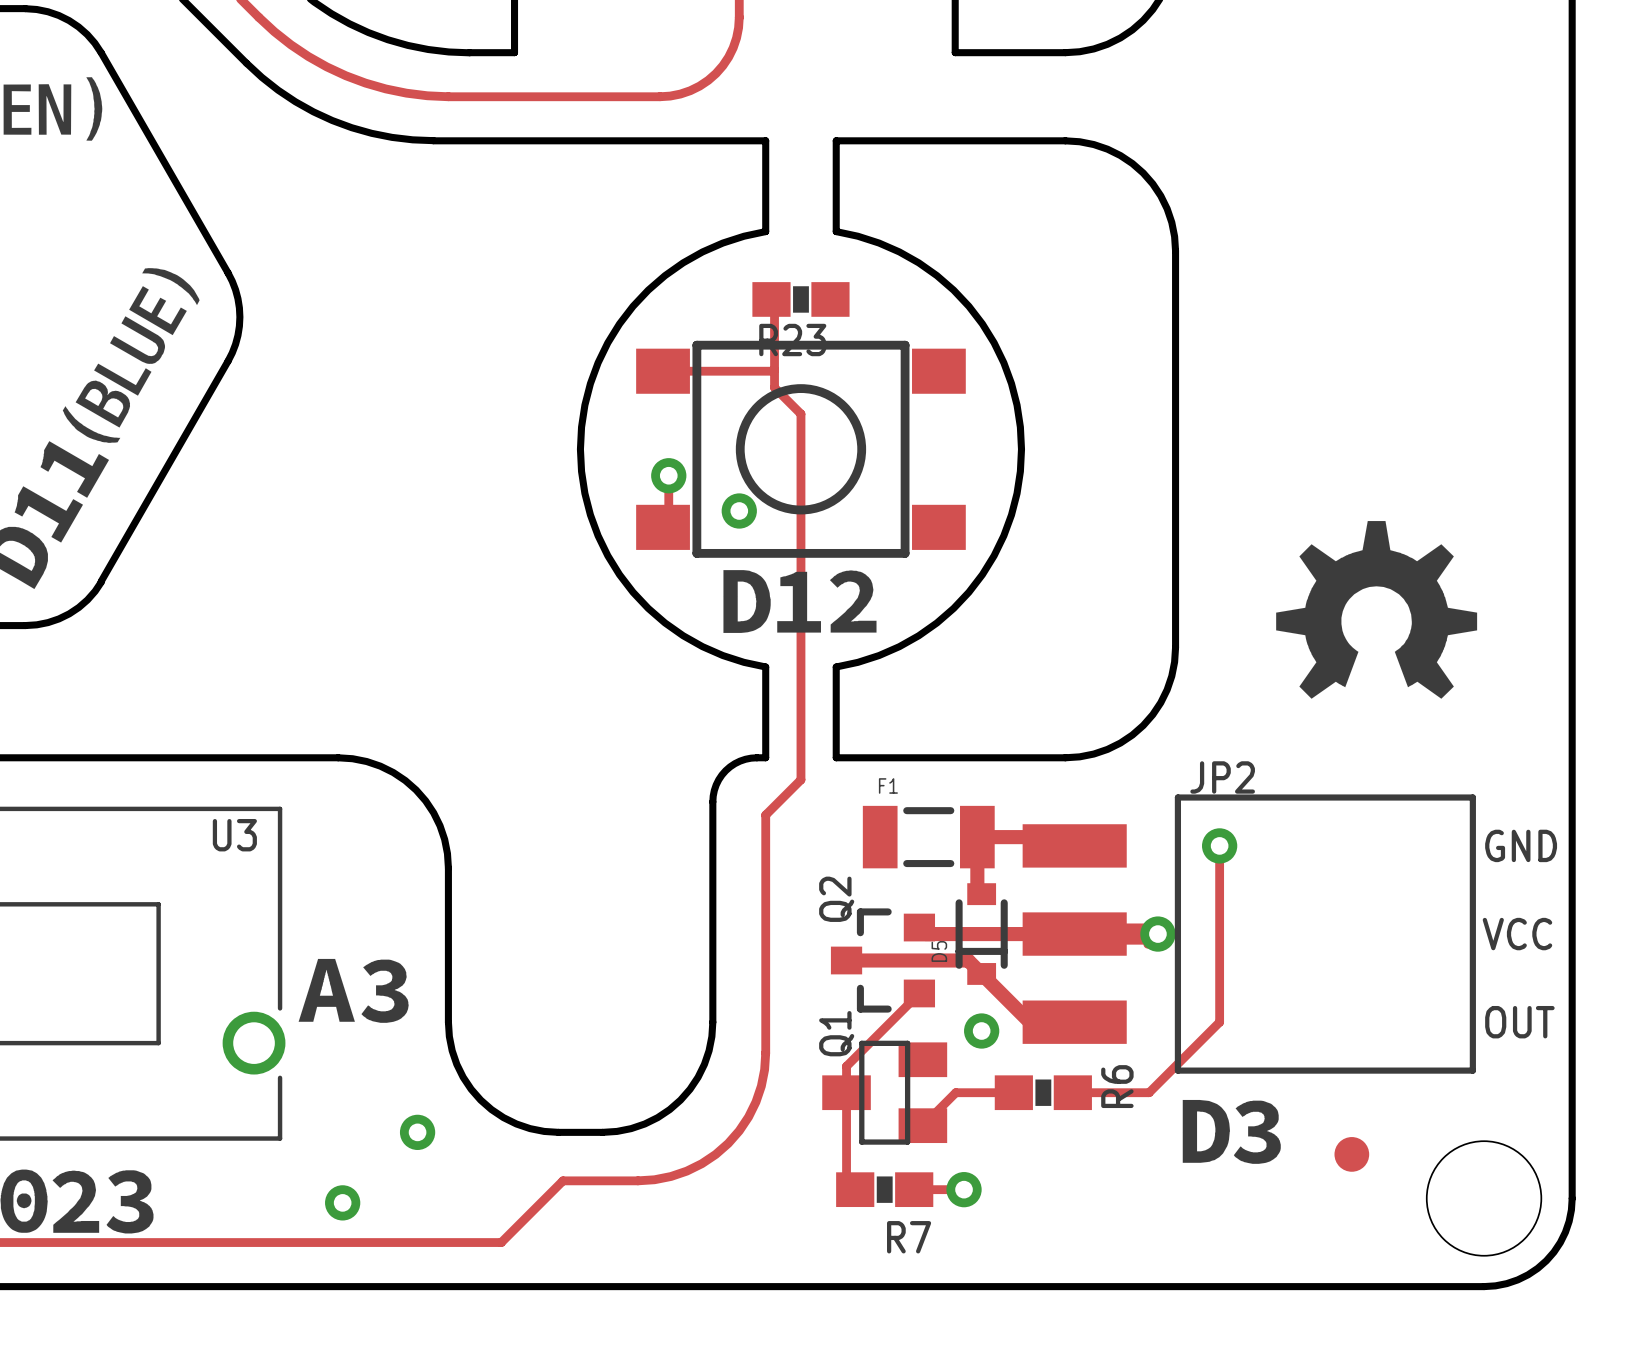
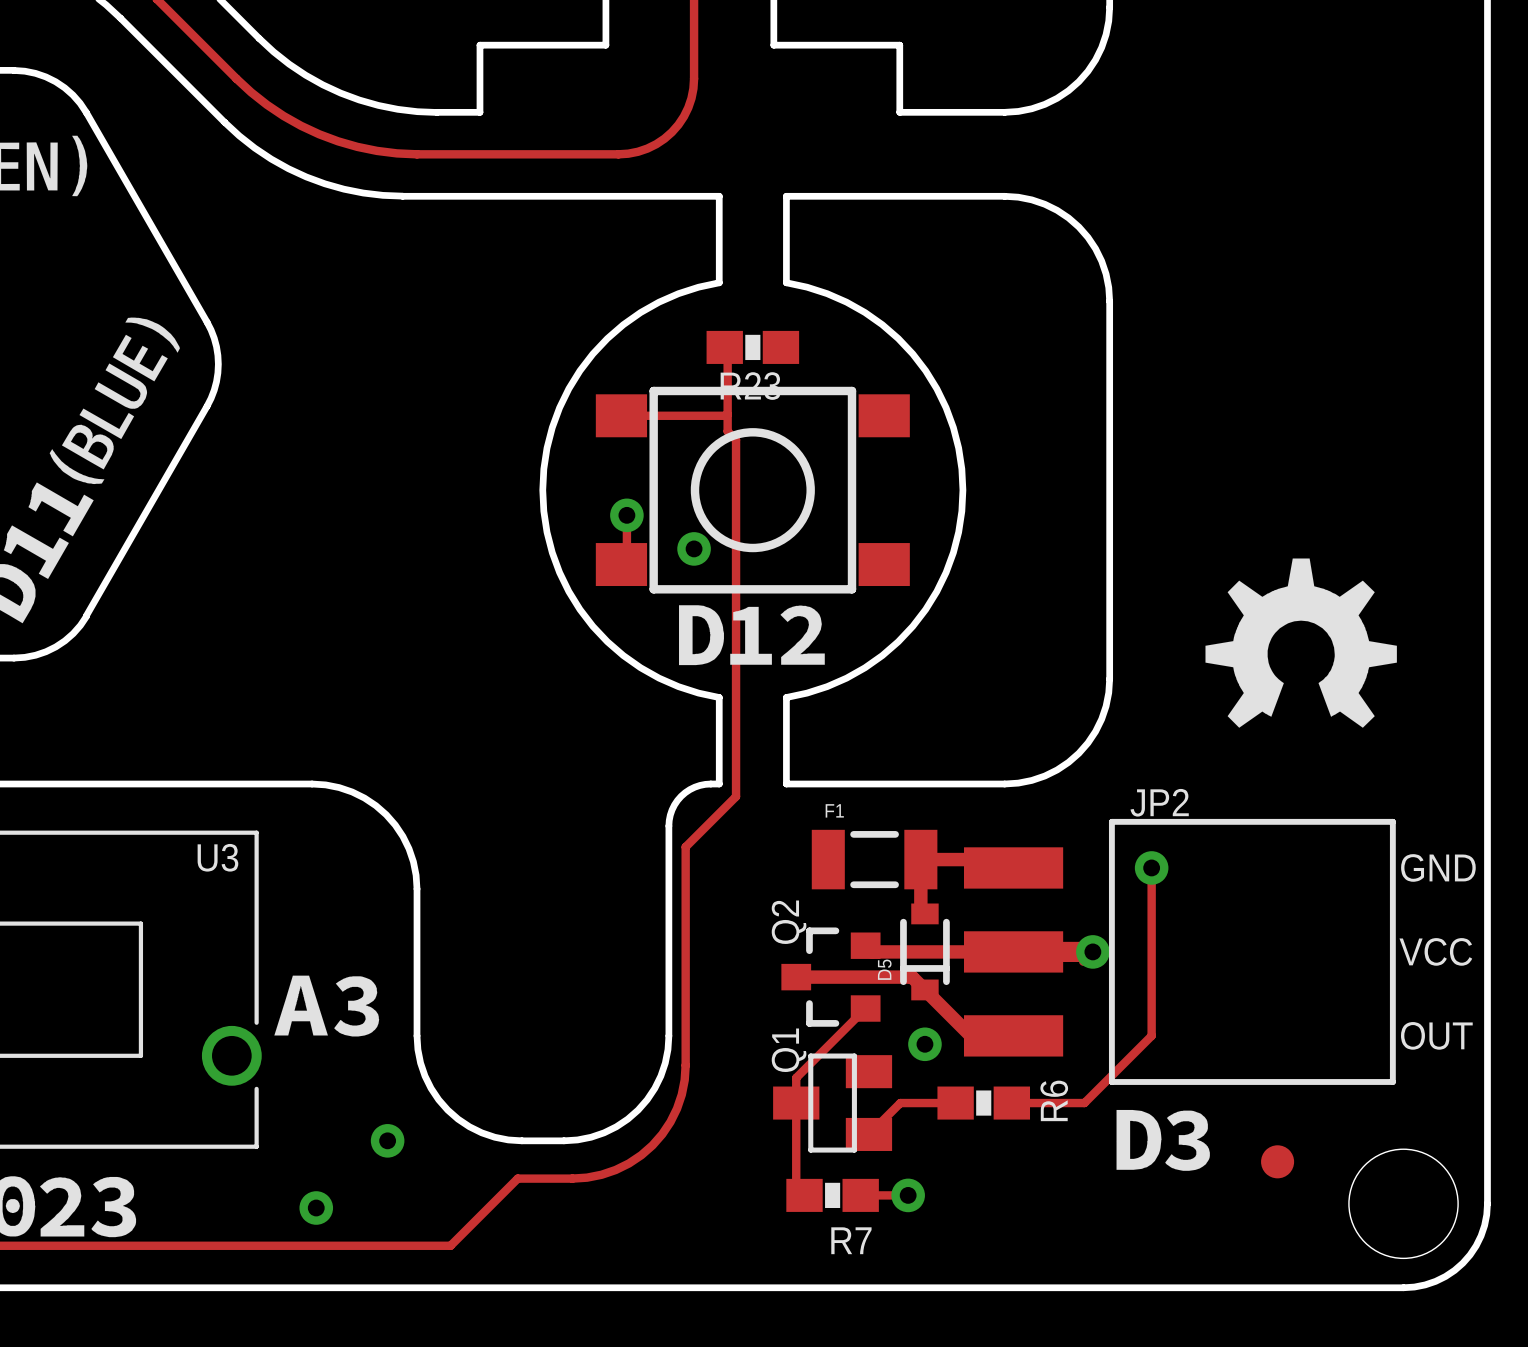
track: (783, 396) (800, 414) (800, 779) (765, 815) (765, 1053) (764, 1069) (755, 1101) (748, 1116) (728, 1143) (701, 1163) (686, 1171) (654, 1179) (563, 1180) (501, 1242) (483, 1242) -> (736, 439) (736, 796) (685, 846) (685, 1065) (681, 1094) (677, 1108) (670, 1121) (652, 1145) (629, 1163) (615, 1169) (587, 1177) (517, 1178) (450, 1245)

